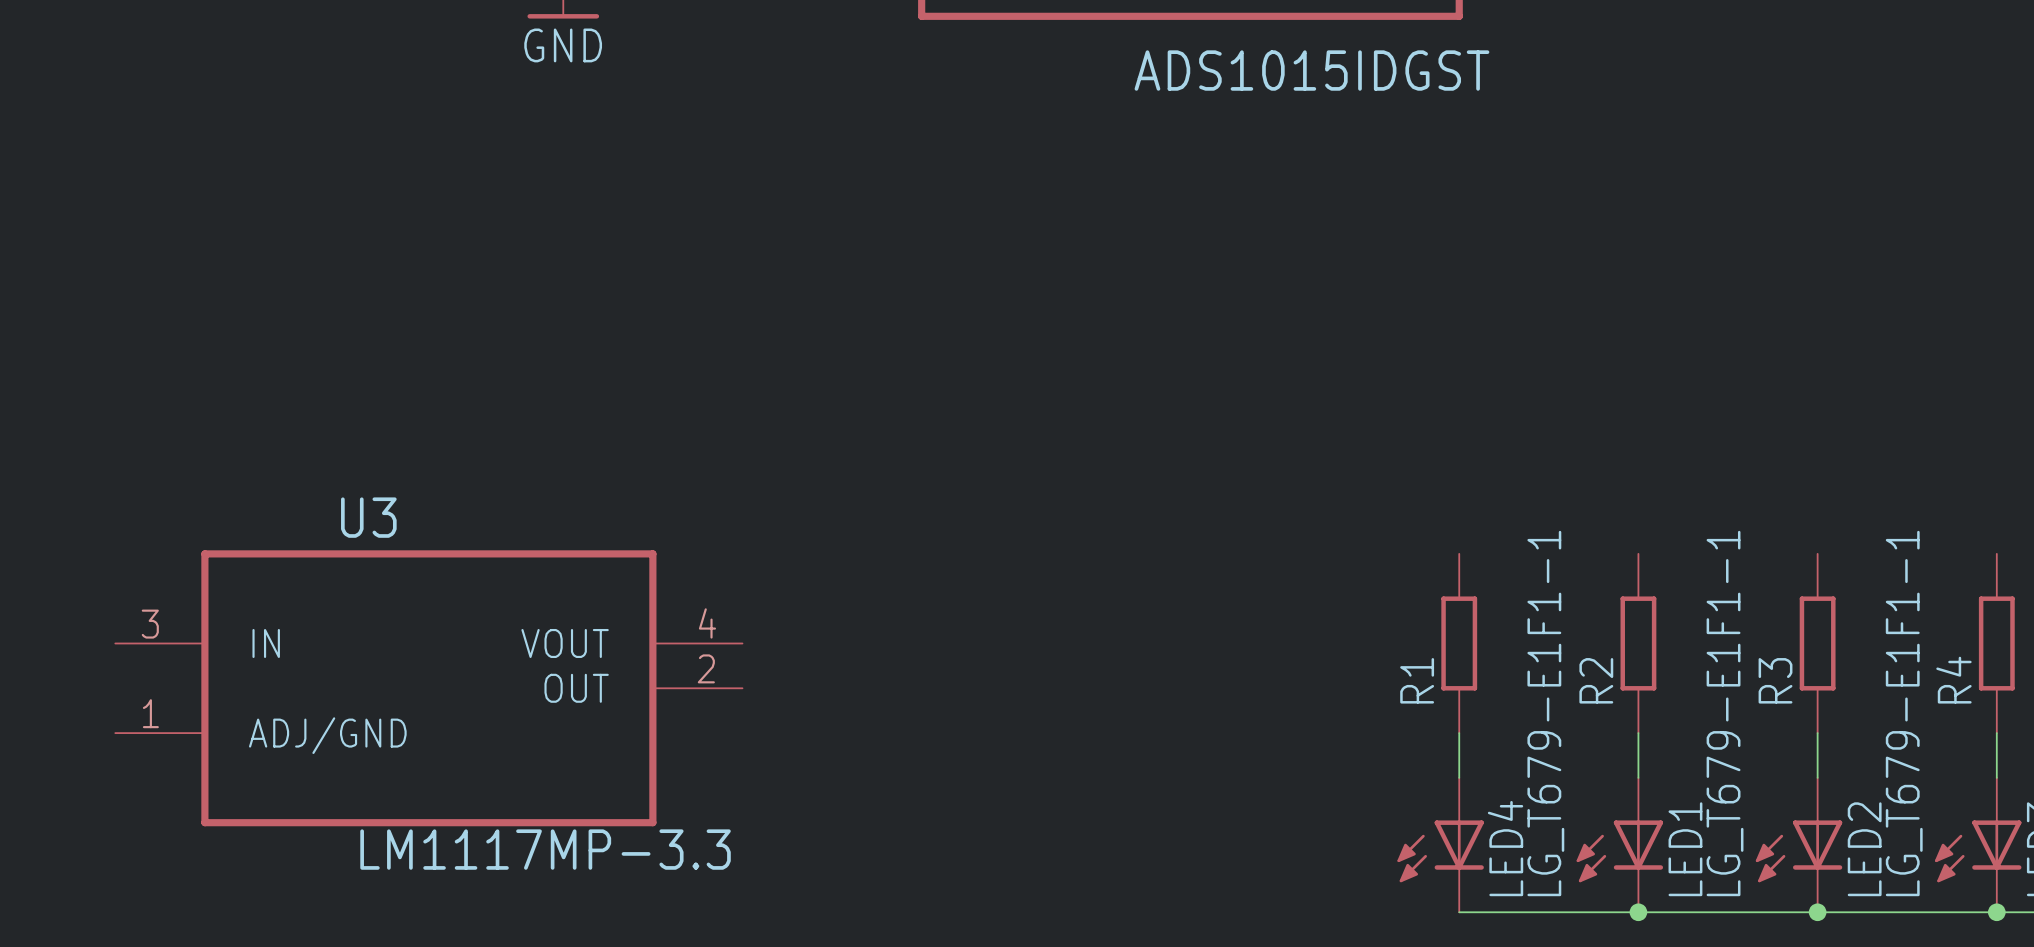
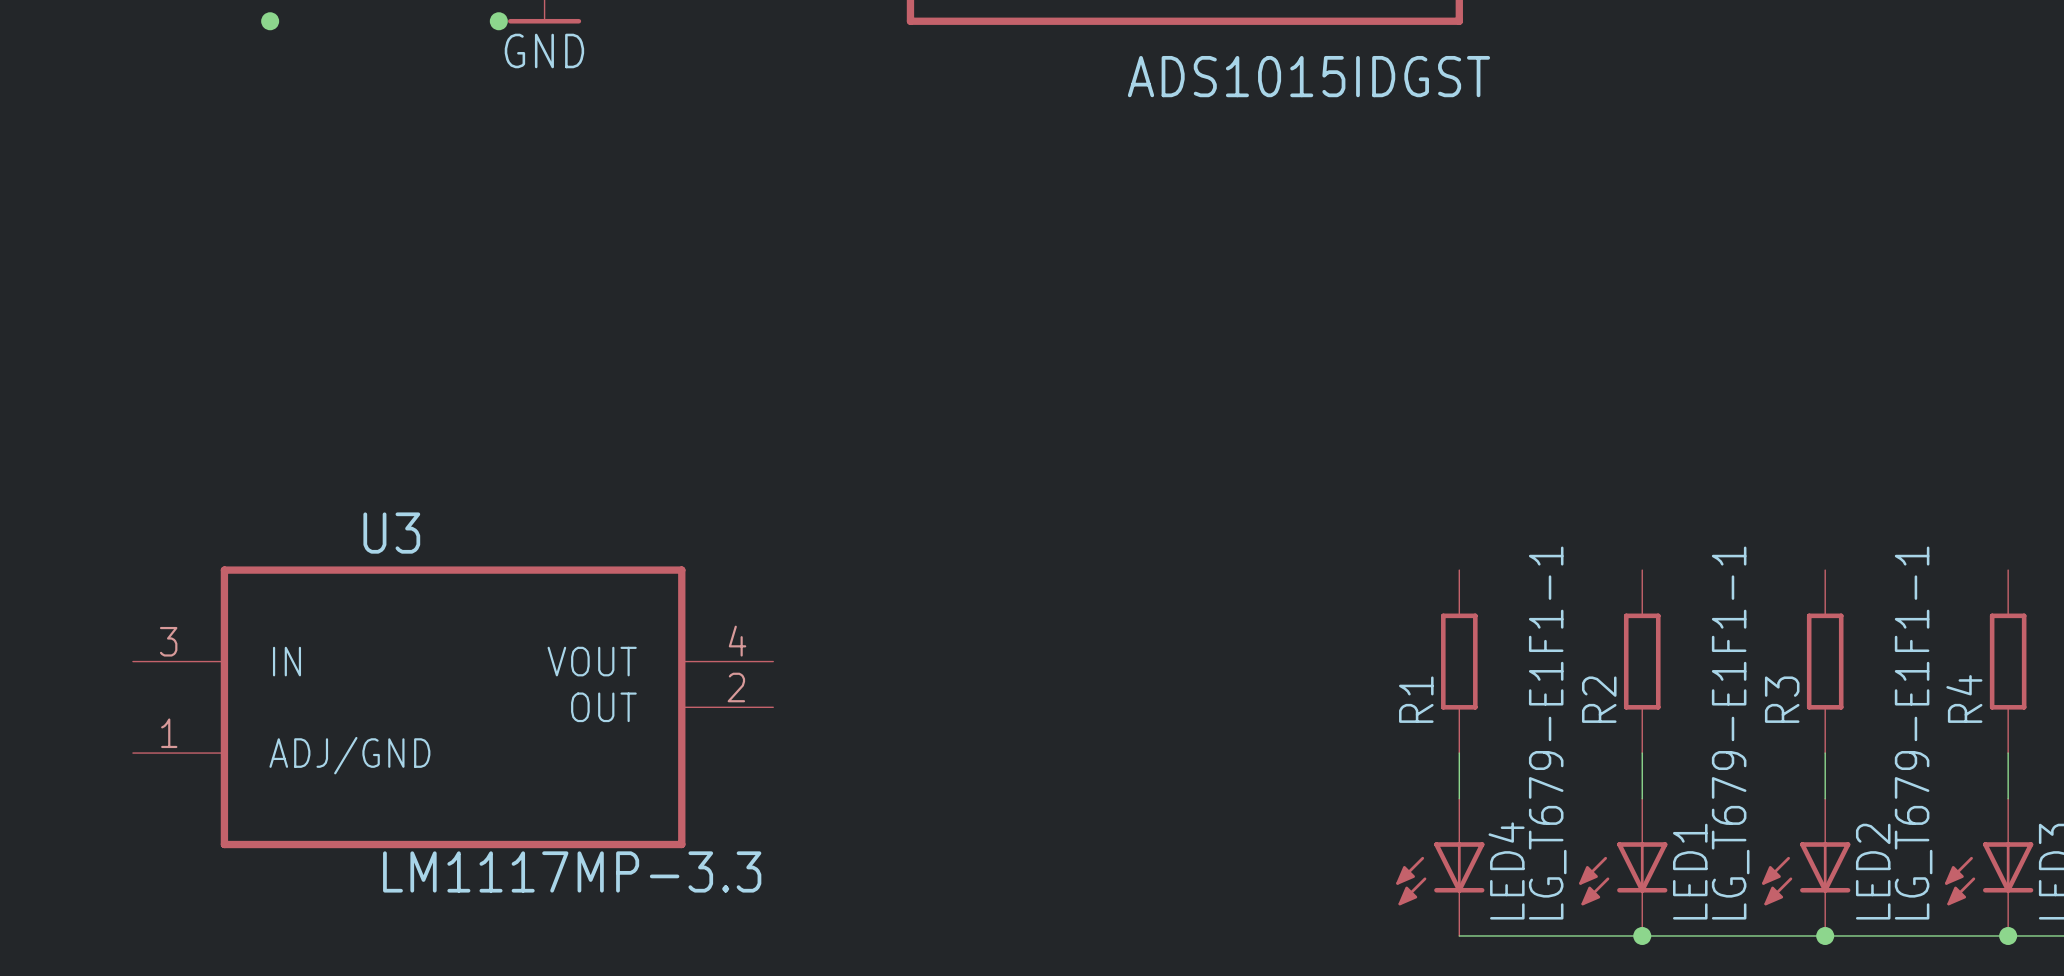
junction: none -> (270, 21)
junction: none -> (498, 21)
U3 position: (428, 688) -> (453, 707)

